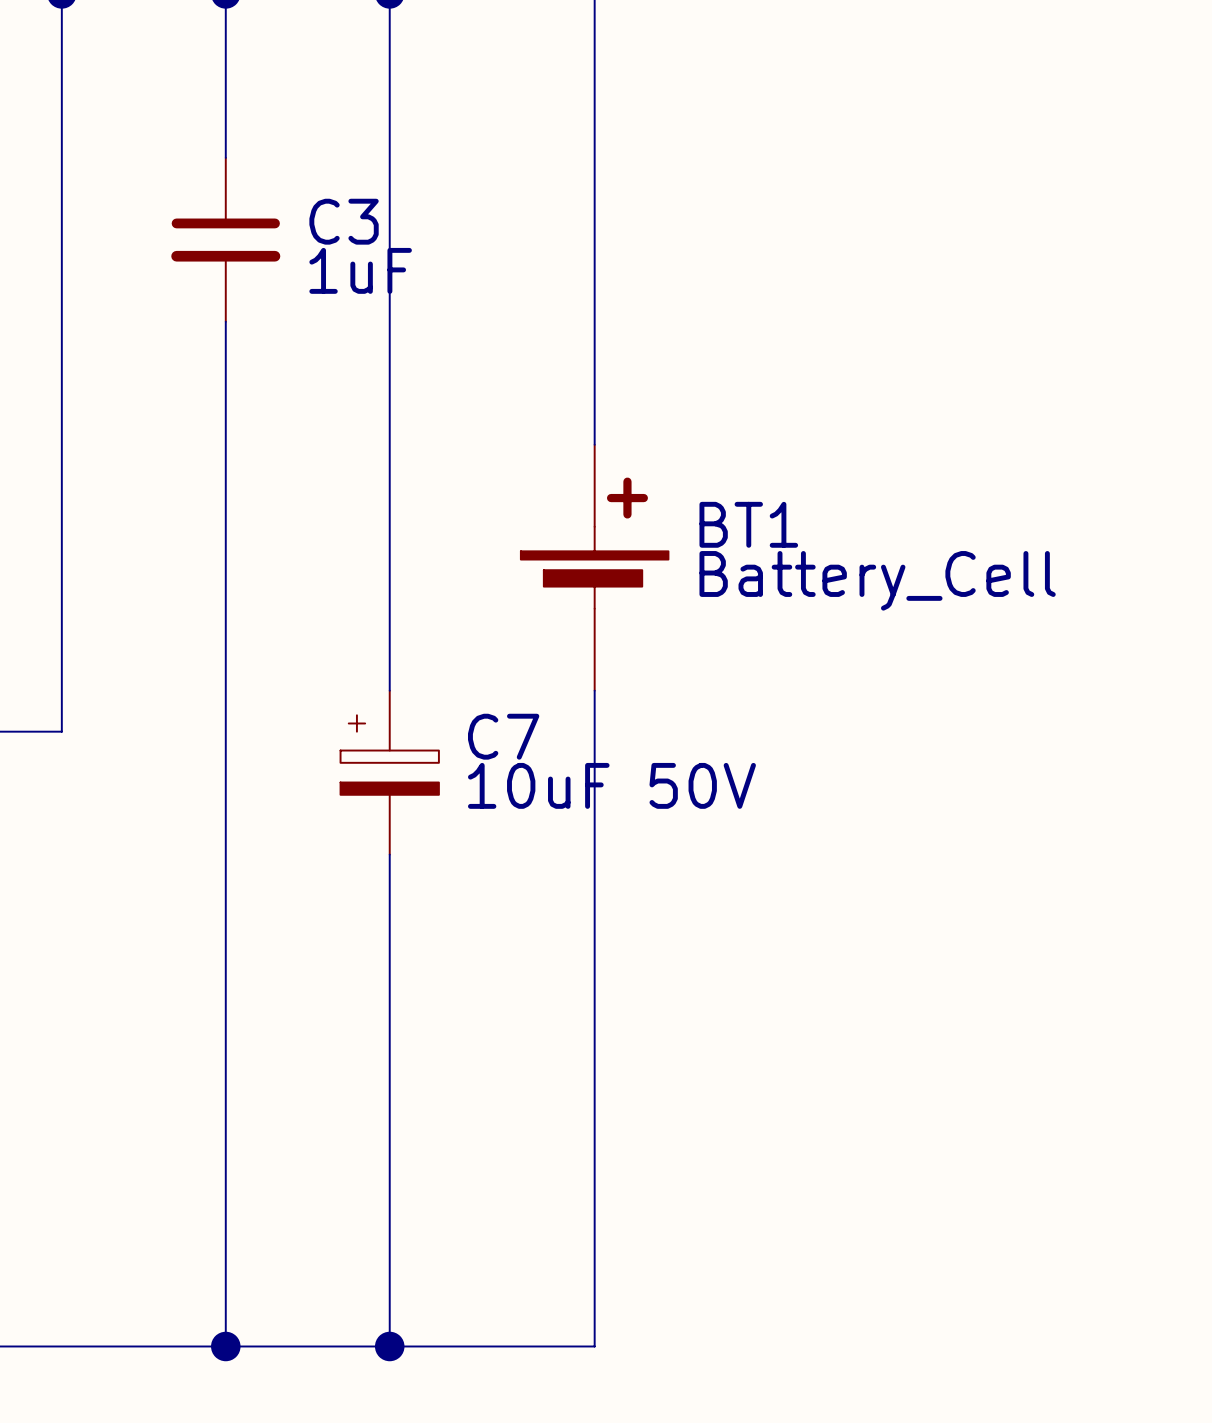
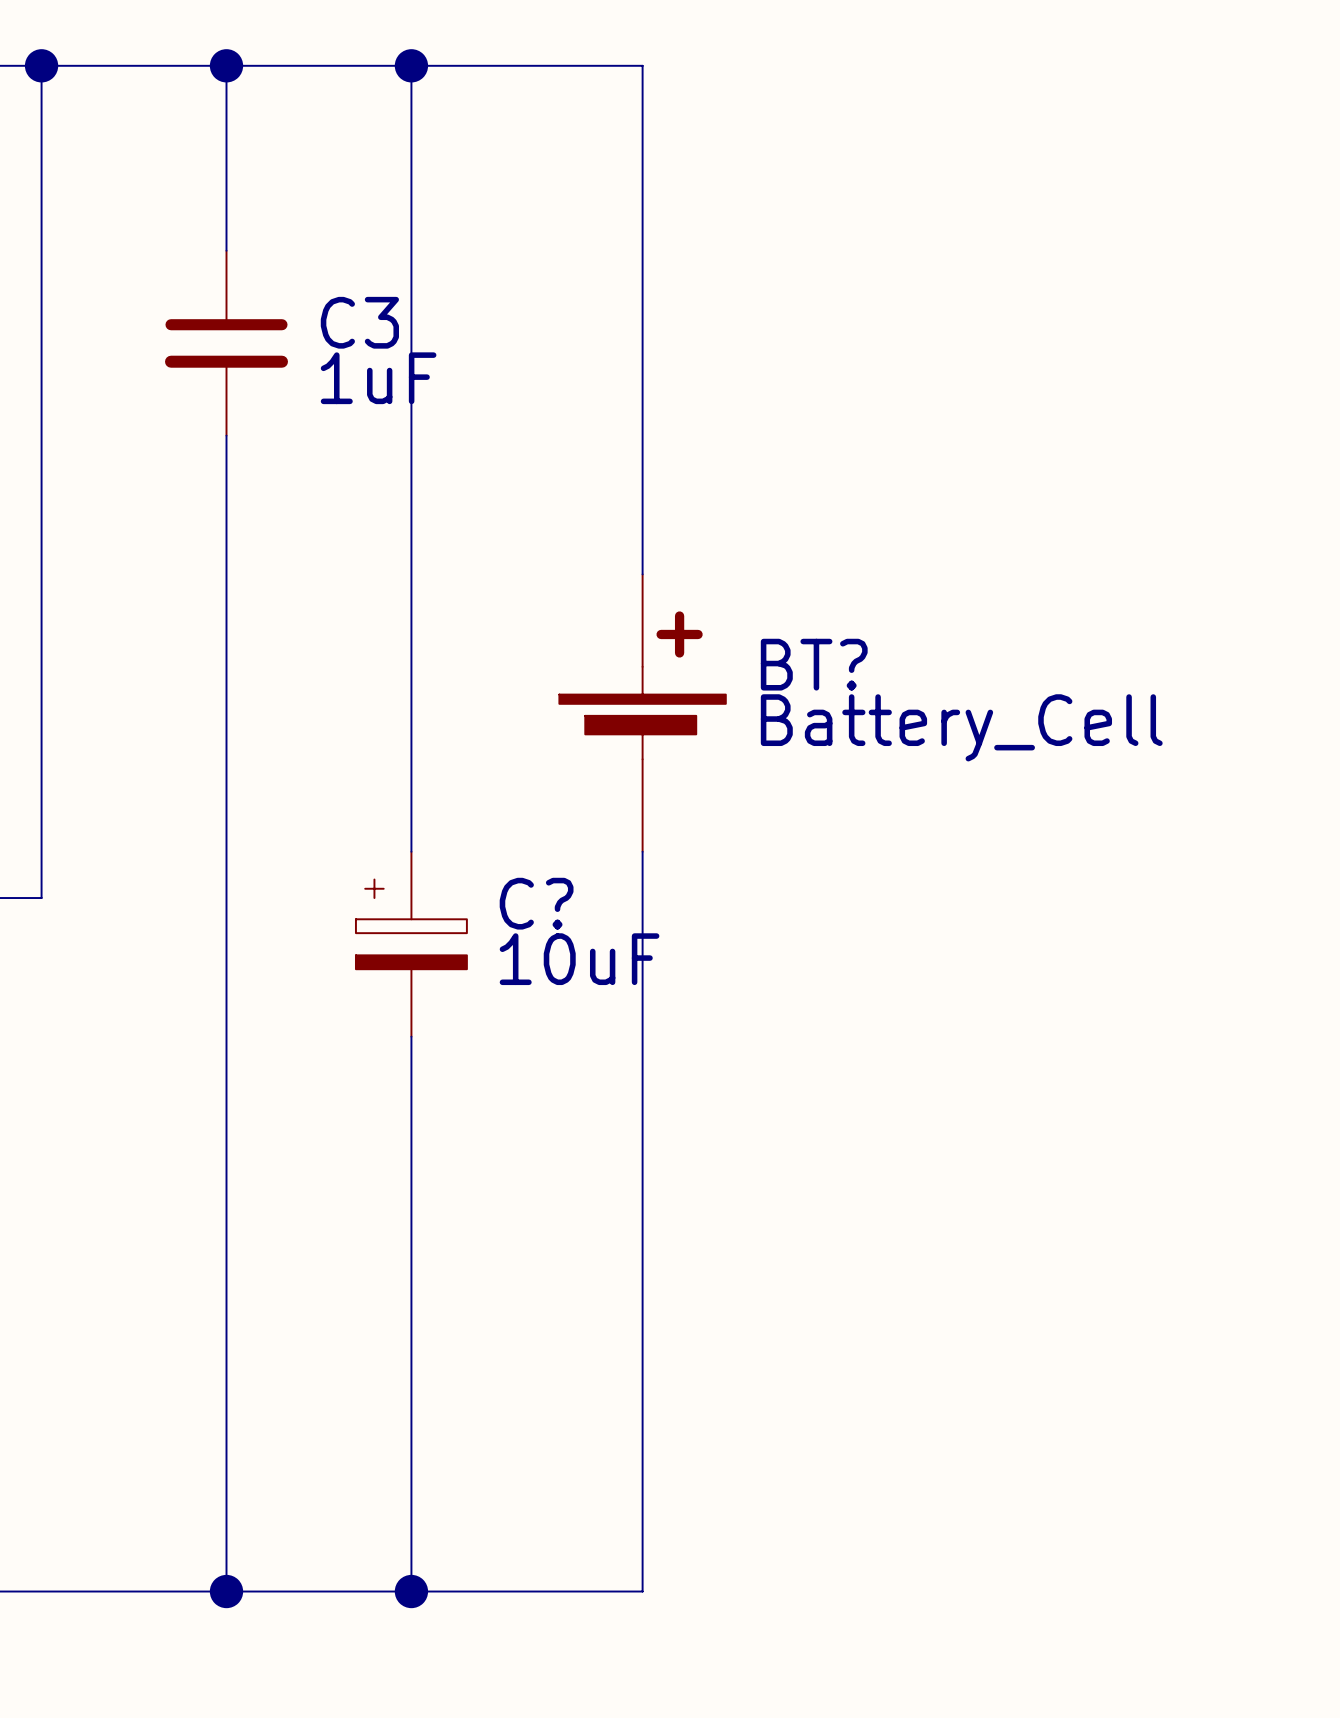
BT1 name: BT1 (748, 524) -> BT? (814, 664)
C7 name: C7 (503, 736) -> C? (536, 903)
C7 value: 10uF 50V (611, 785) -> 10uF (579, 959)

